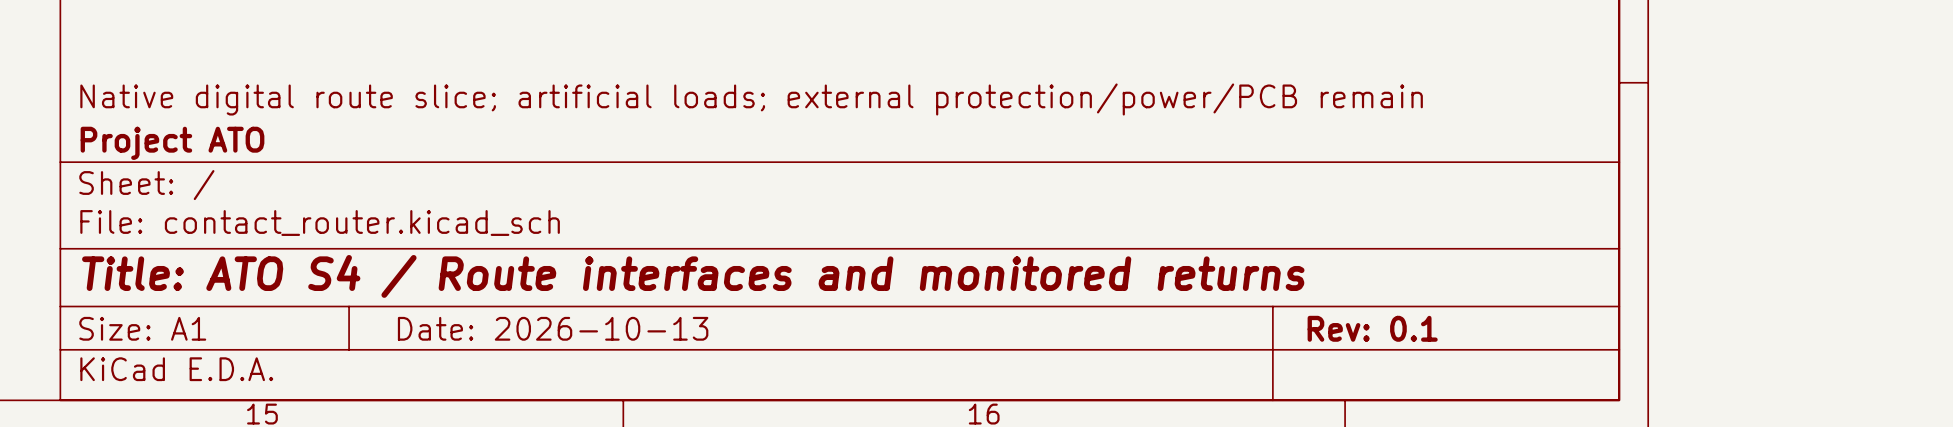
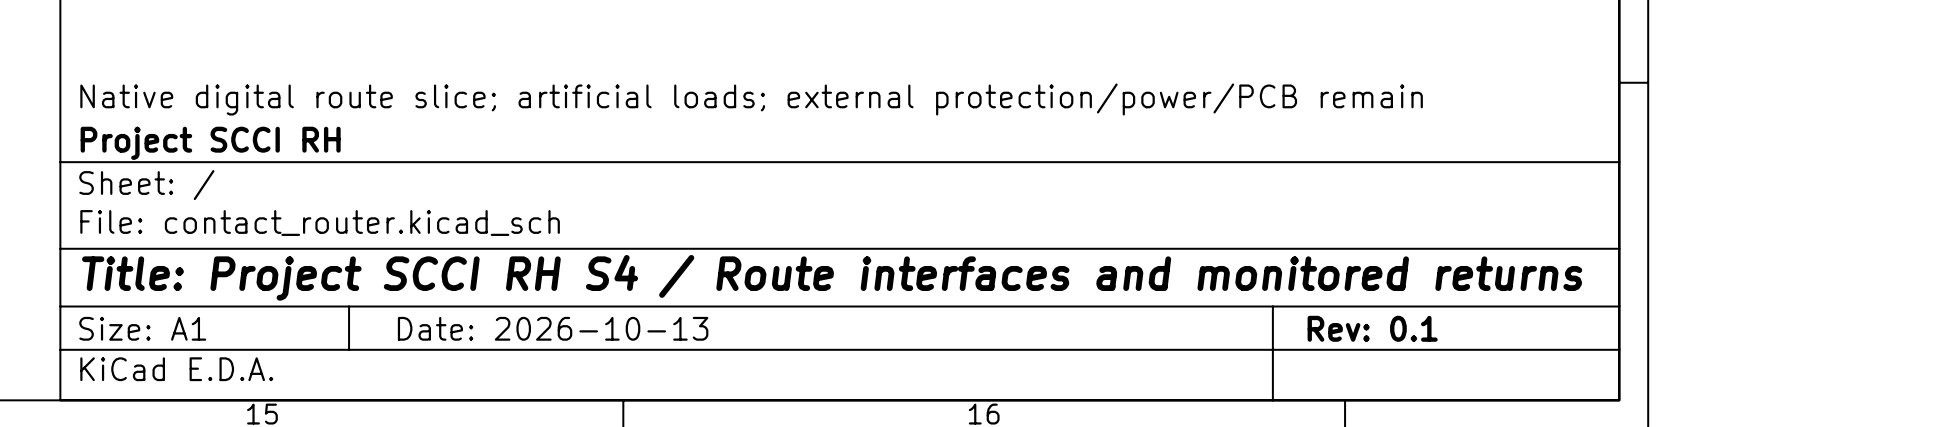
title block: Project ATO (172, 143) -> Project SCCI RH (210, 143)
title block: Title: ATO S4 / Route interfaces and monitored returns (693, 276) -> Title: Project SCCI RH S4 / Route interfaces and monitored returns (832, 277)

